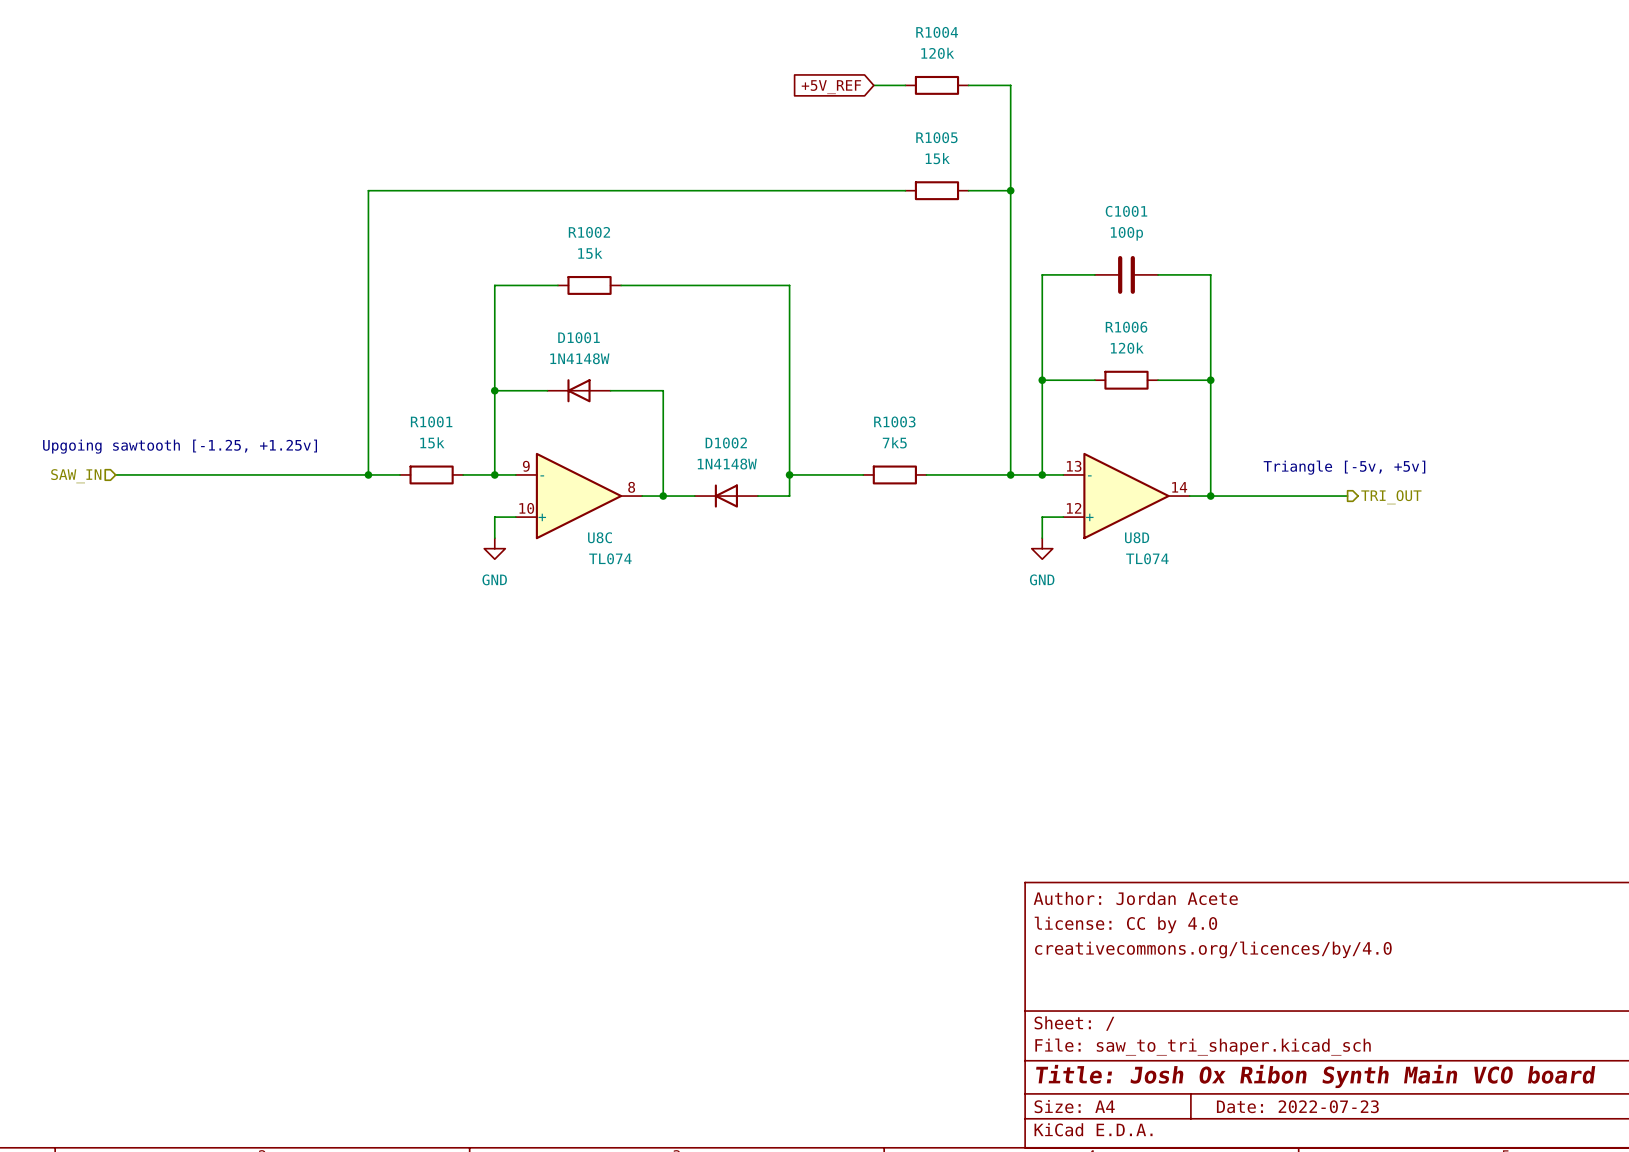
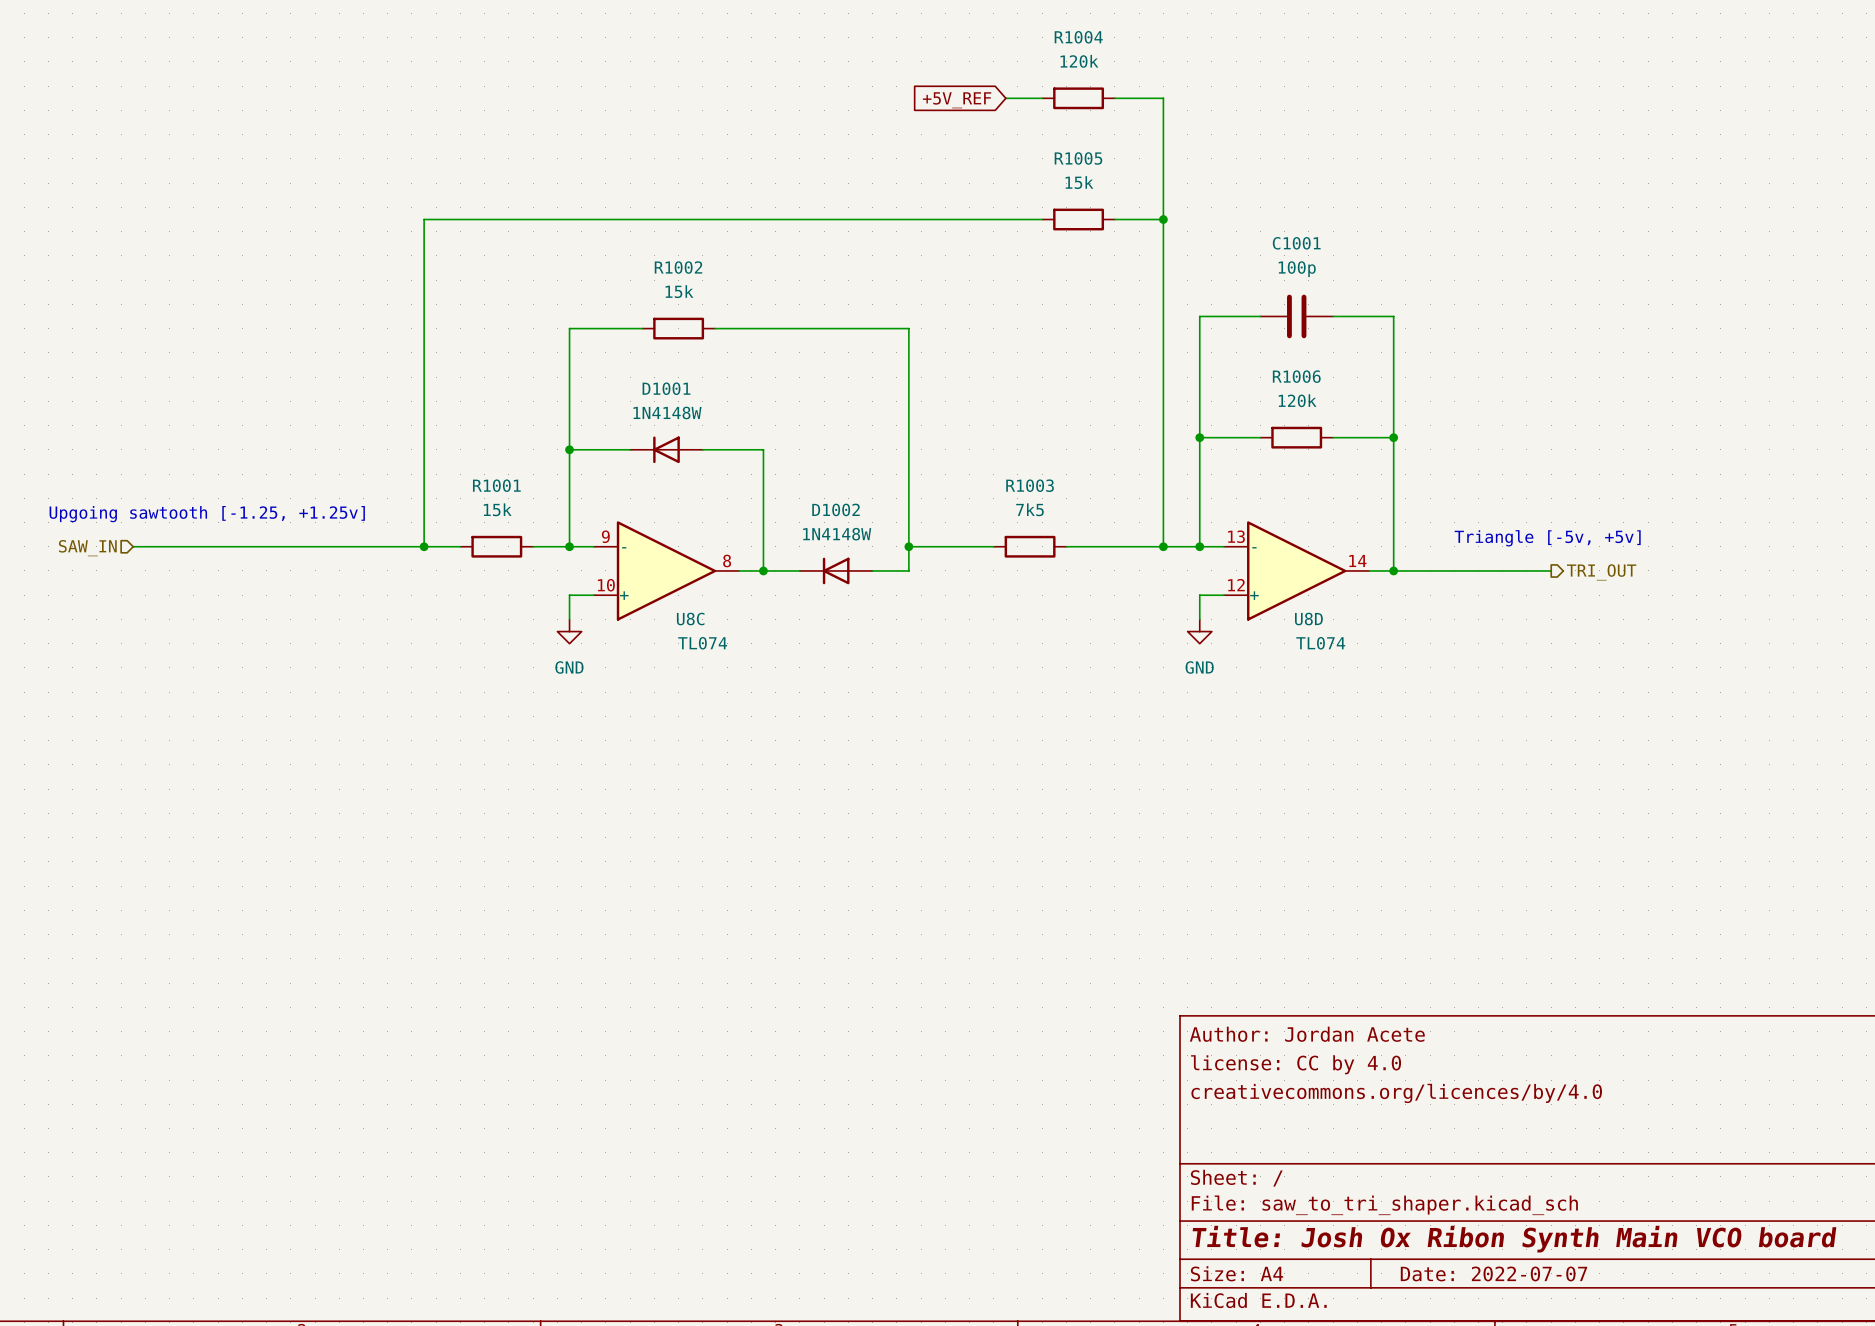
title block: Date: 2022-07-23 (1297, 1106) -> Date: 2022-07-07 (1493, 1273)

